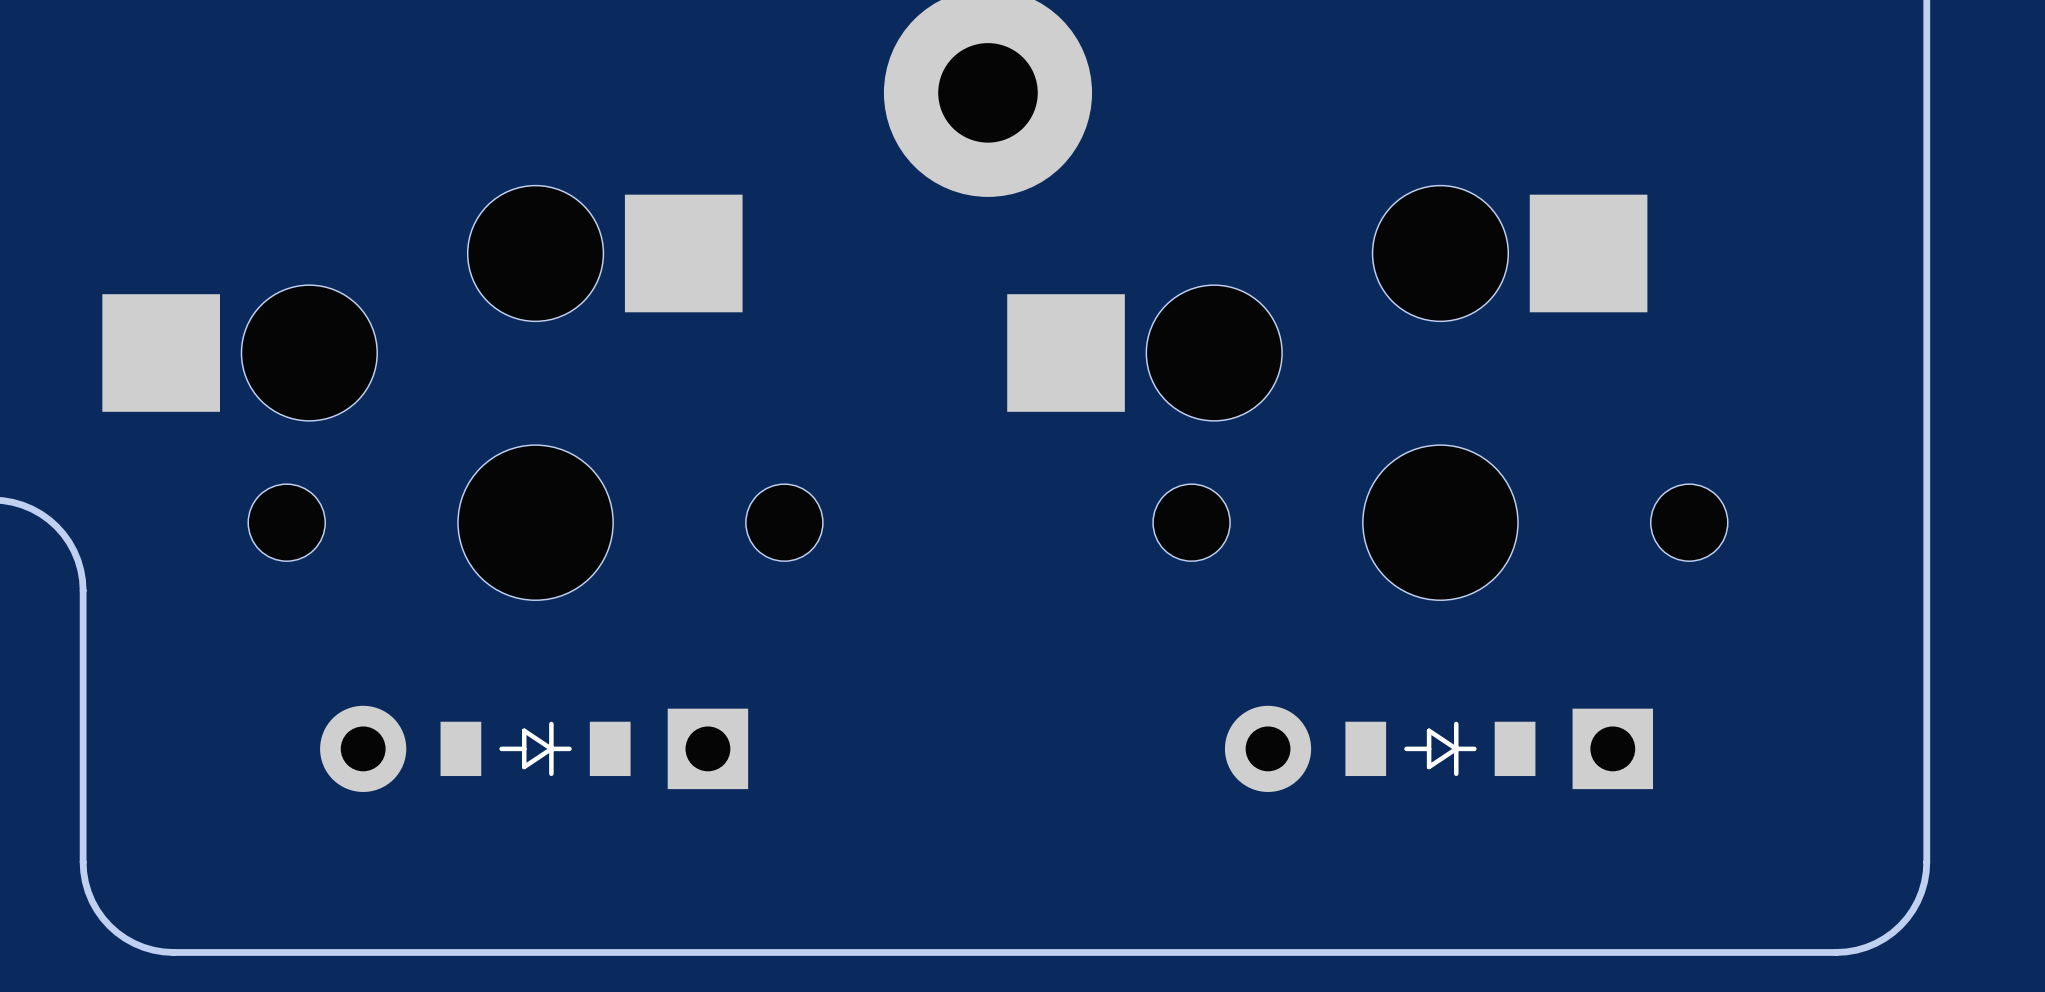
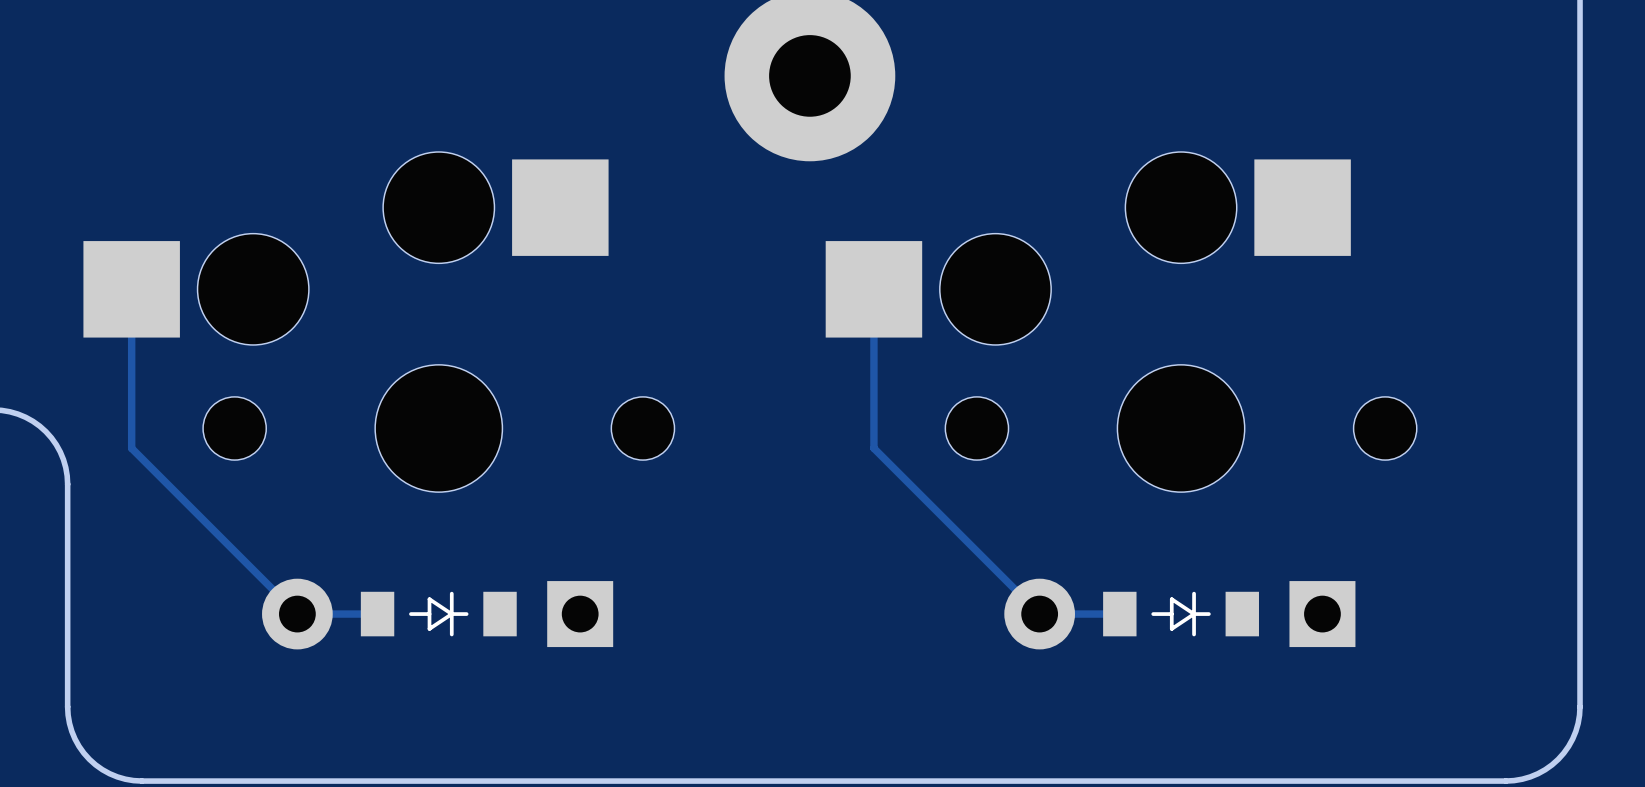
track: none -> (131, 289) (131, 448) (297, 614) (377, 614)
track: none -> (873, 289) (873, 448) (1039, 614) (1119, 614)

